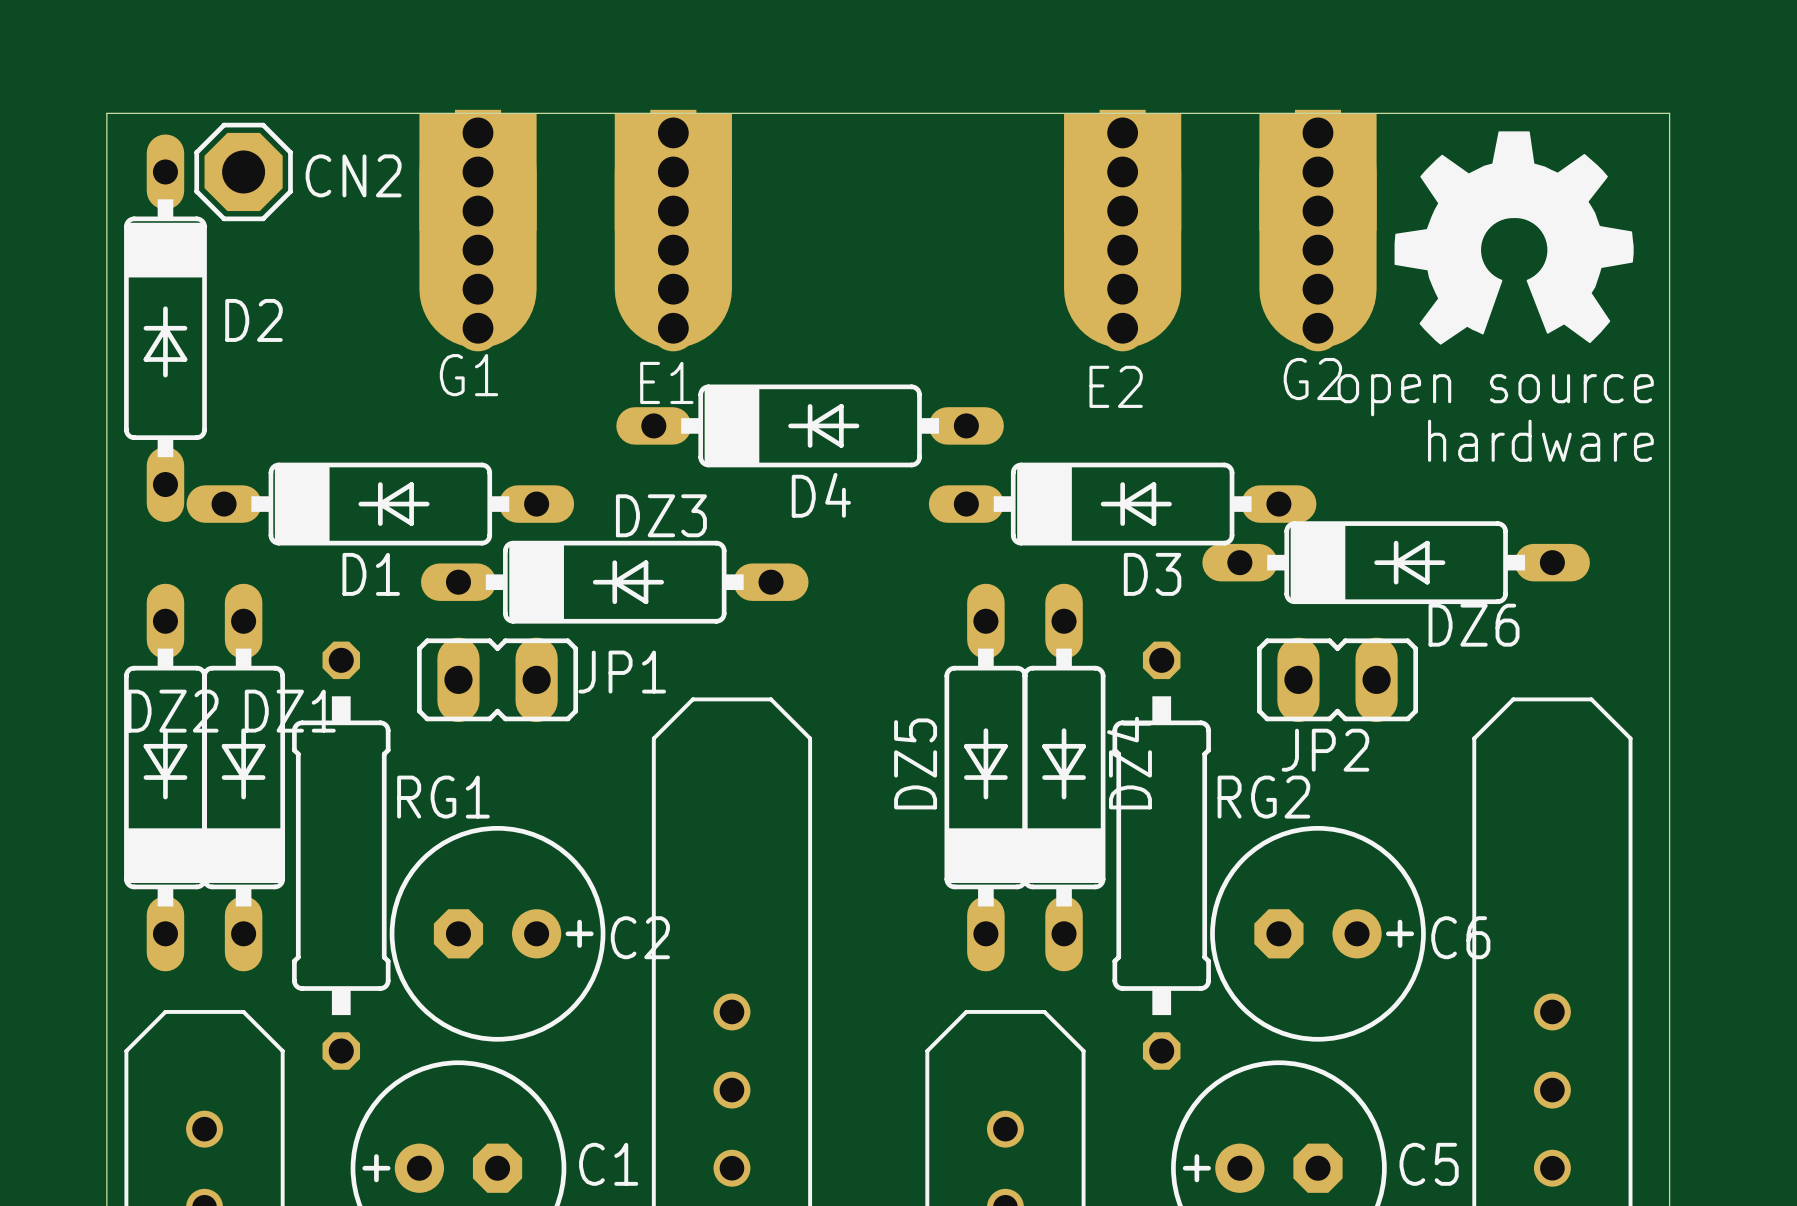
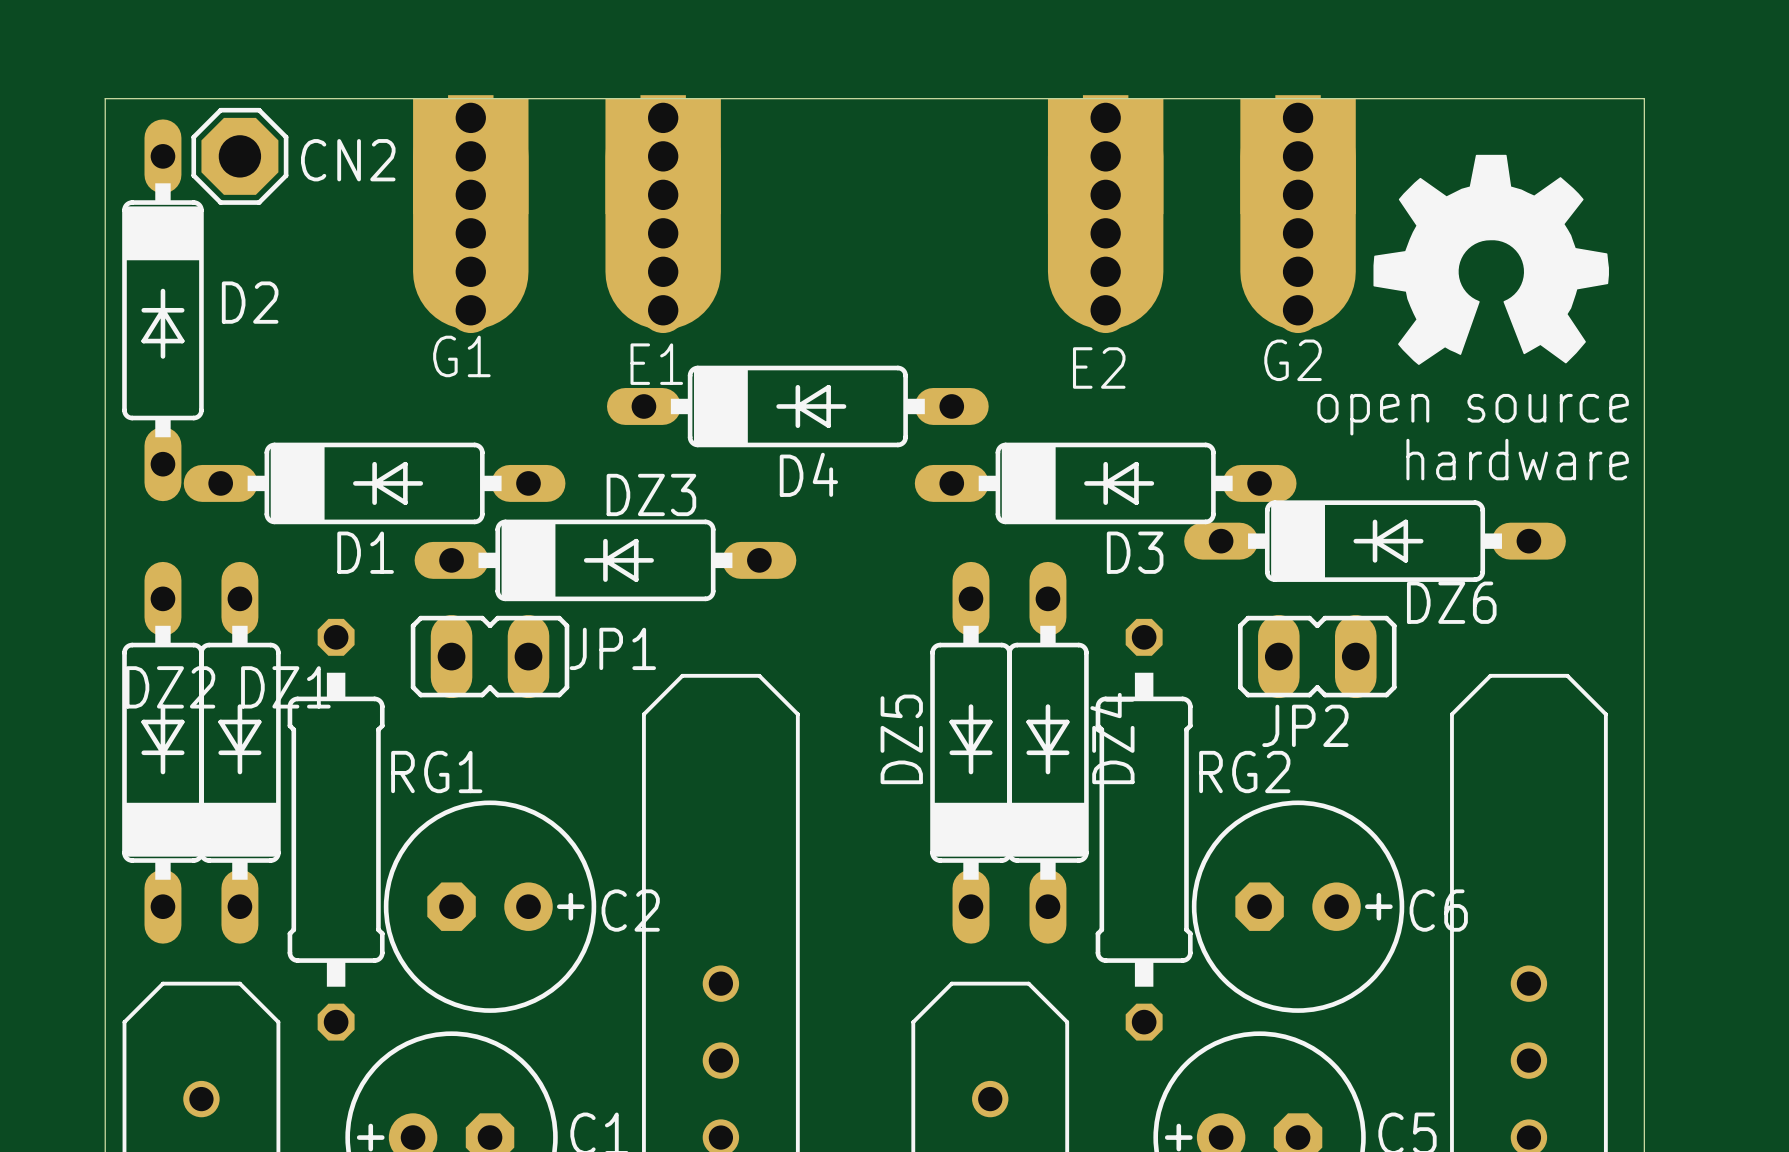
drawing position: (1514, 238) -> (1491, 259)

